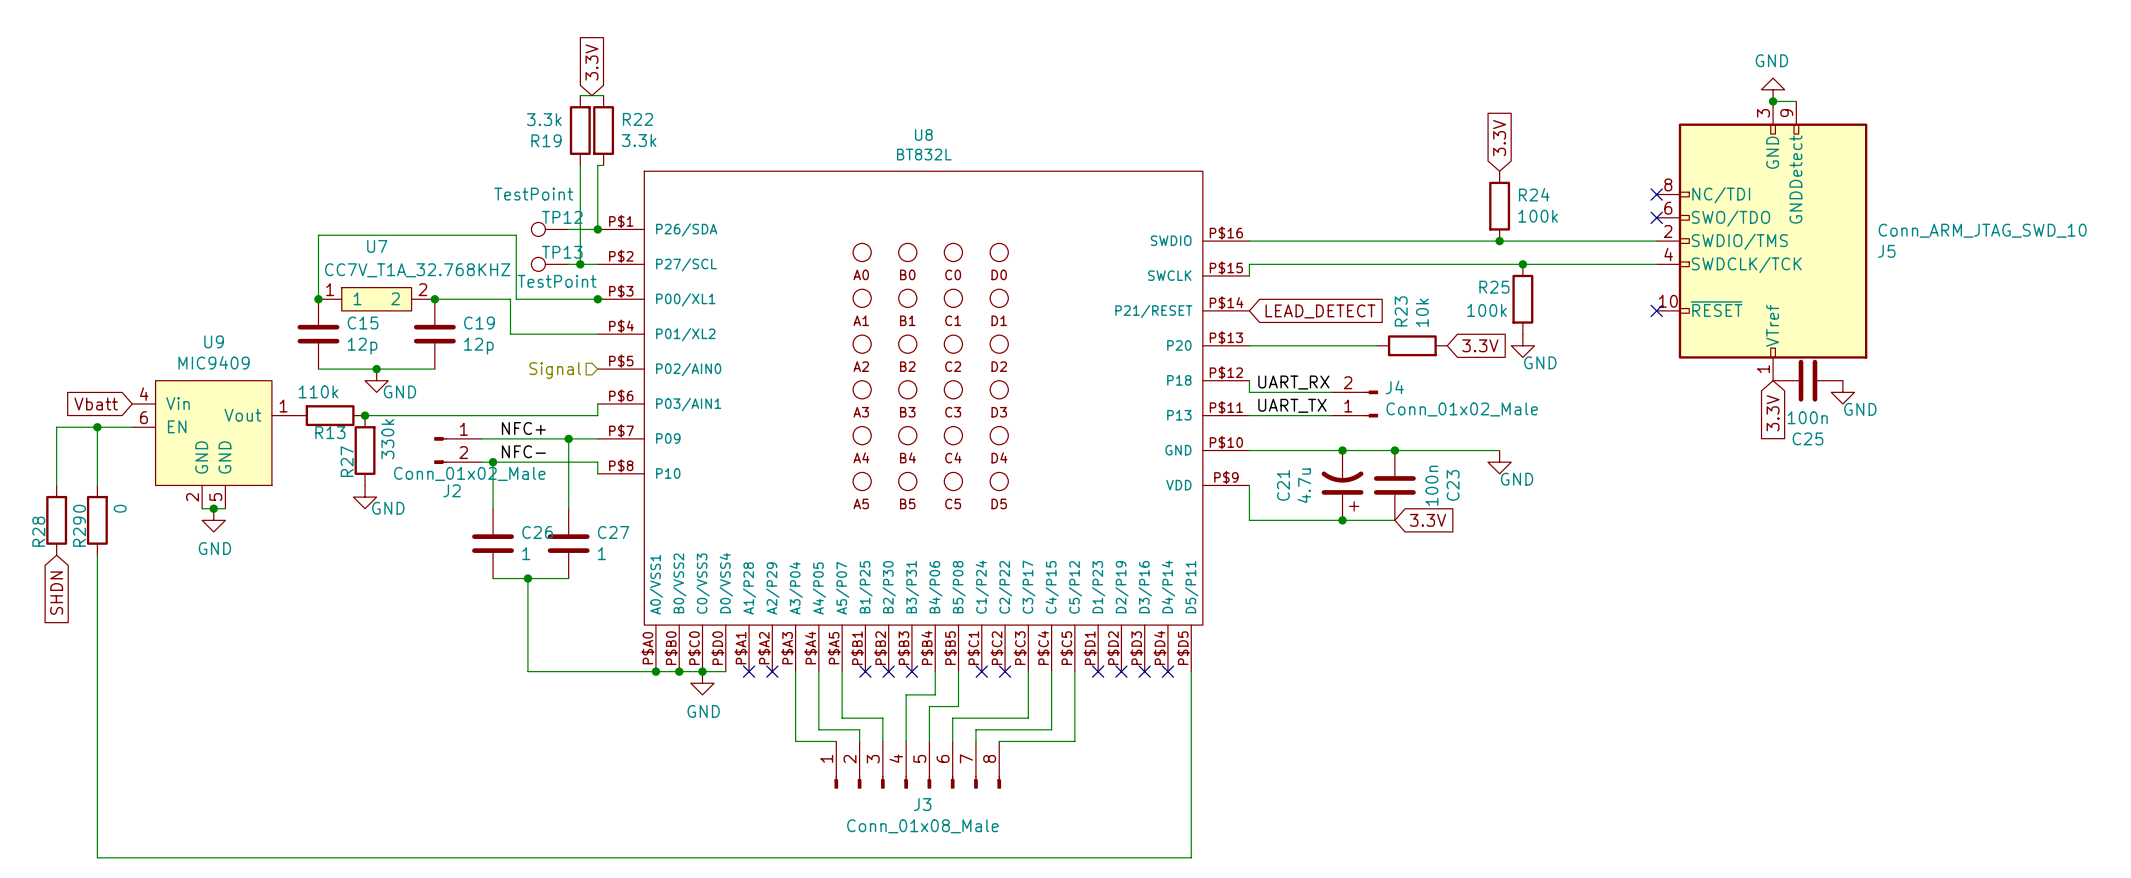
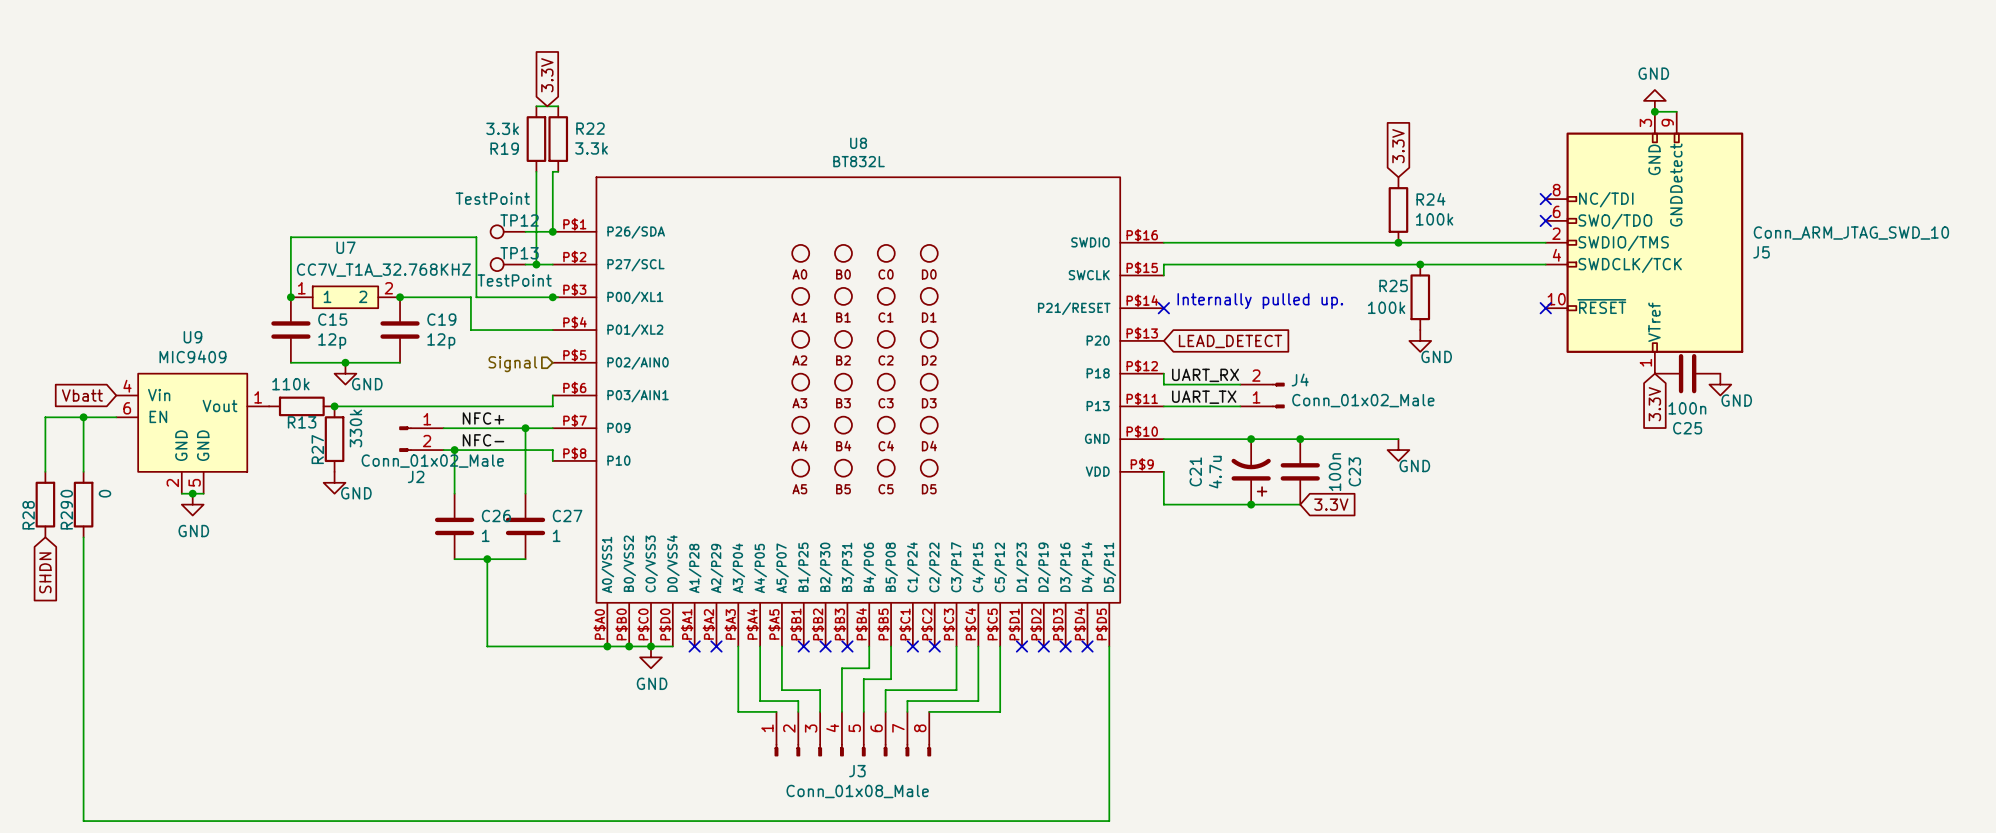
text: none -> Internally pulled up. (1260, 301)
no-connect mark: none -> (1163, 308)
global label position: LEAD_DETECT (1320, 311) -> LEAD_DETECT (1230, 341)
wire: (1249, 345) (1377, 345) -> none
R23: 10k (1412, 345) -> none
global label: 3.3V (1480, 345) -> none

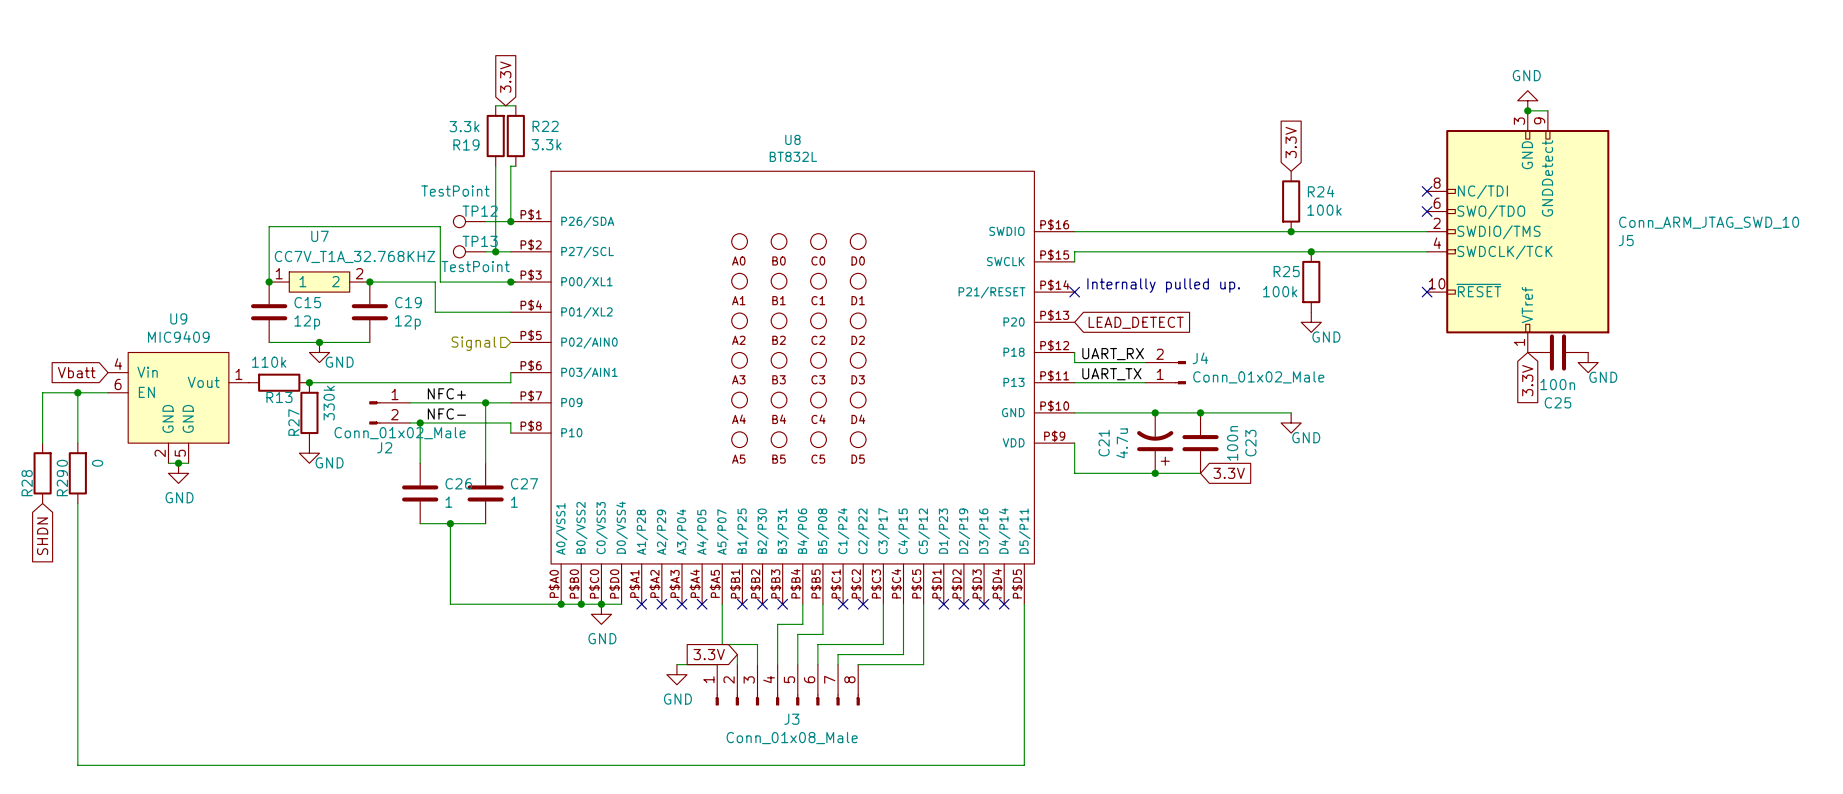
wire: (738, 646) (738, 711) -> (676, 664) (681, 664)
no-connect mark: none -> (681, 604)
wire: (760, 646) (760, 701) (798, 701) -> none
no-connect mark: none -> (702, 604)
global label: none -> 3.3V (709, 654)
power symbol: none -> GND (676, 674)

